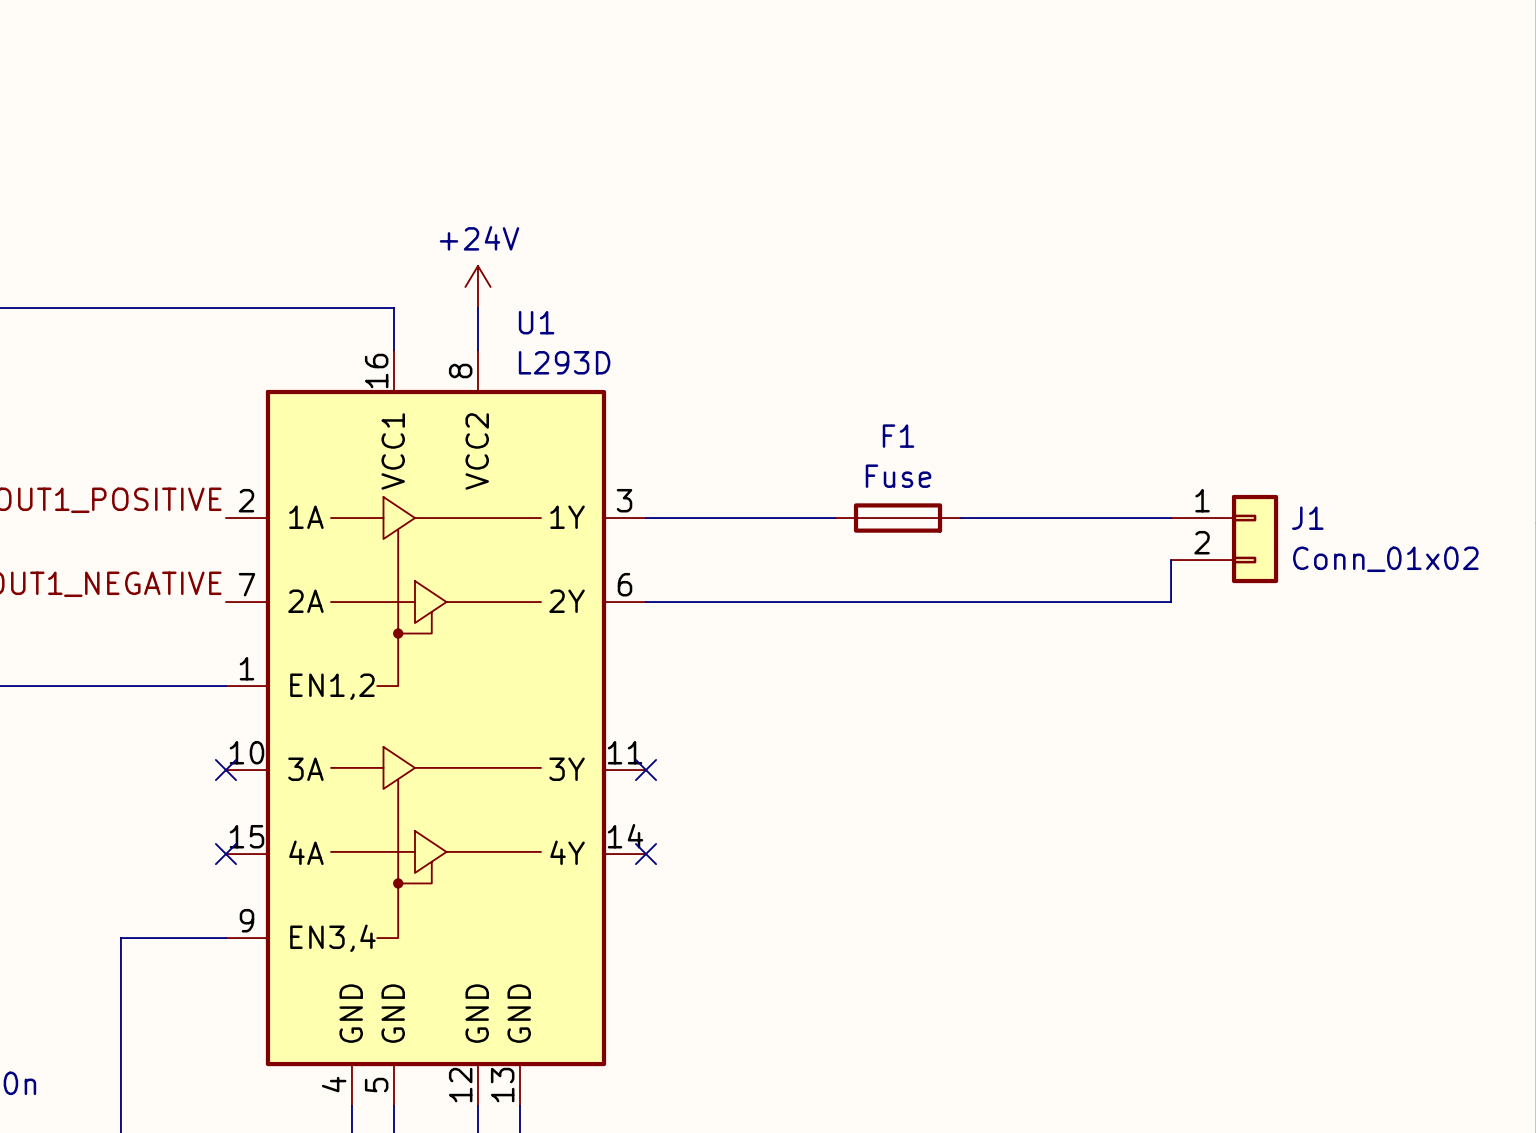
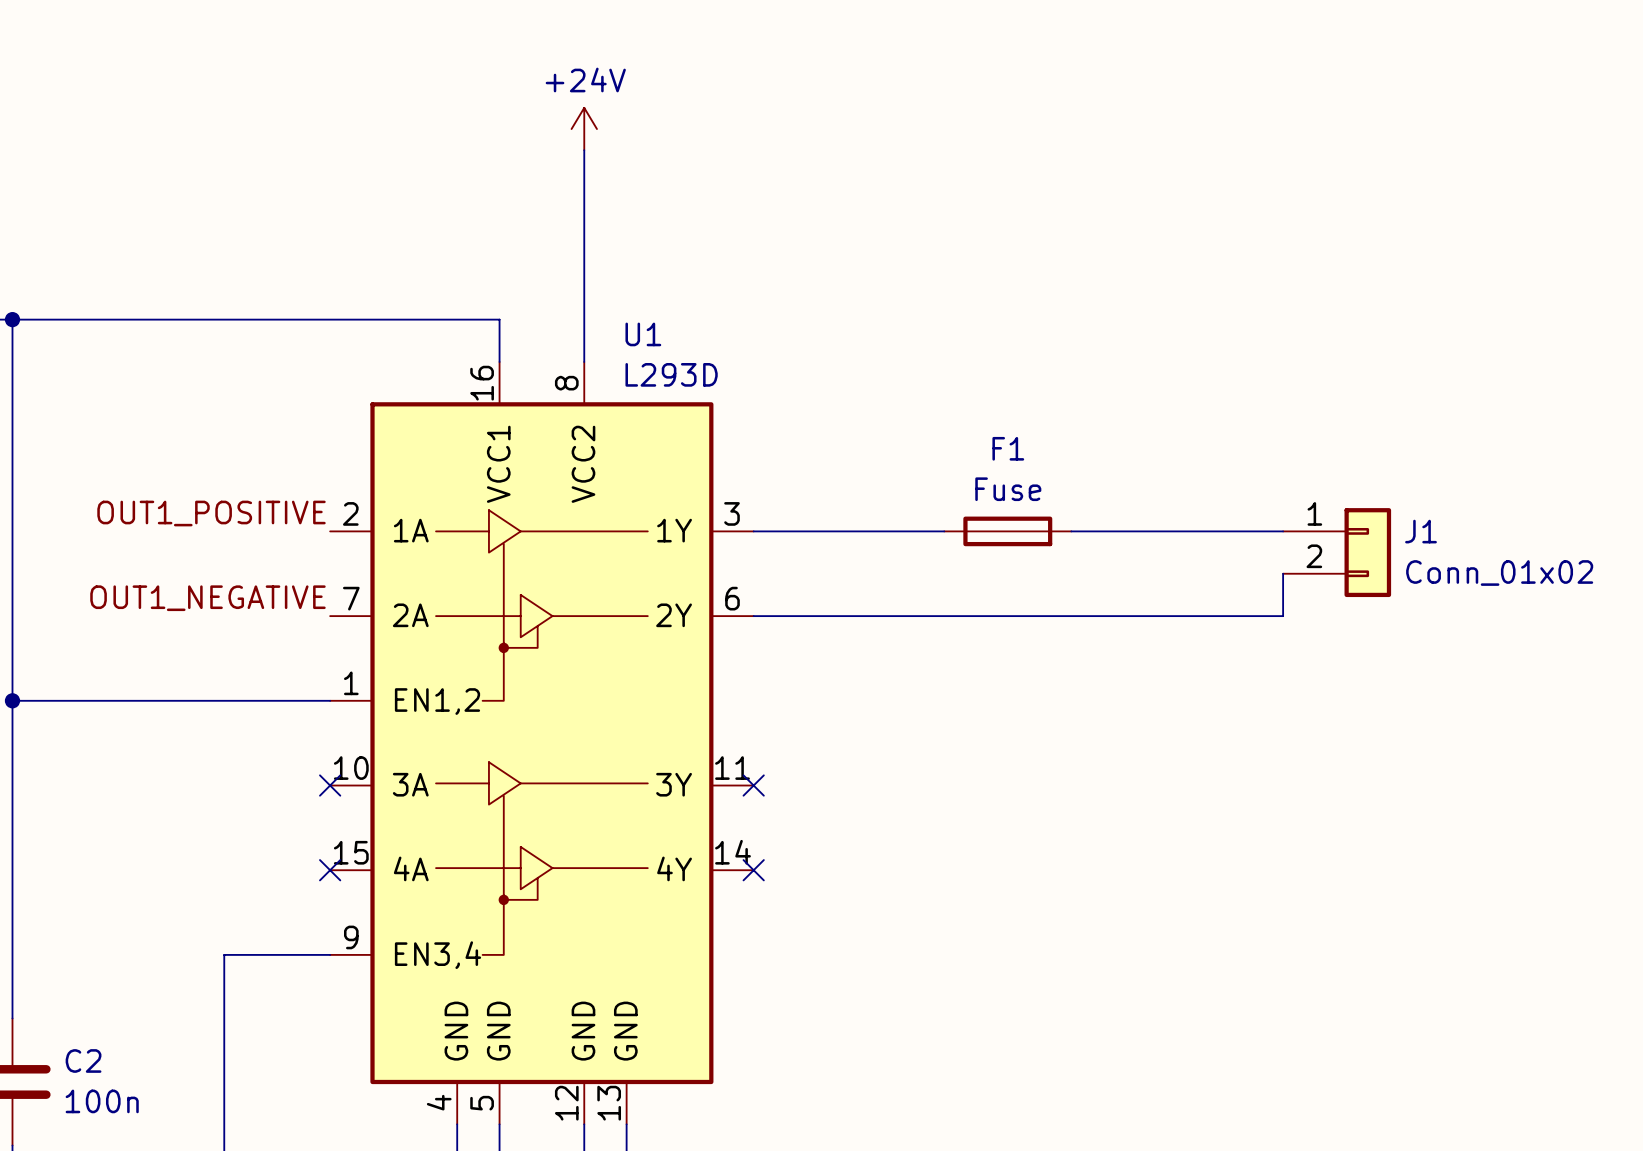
wire: none -> (584, 150) (584, 319)
power symbol position: +24V (477, 287) -> +24V (584, 129)

